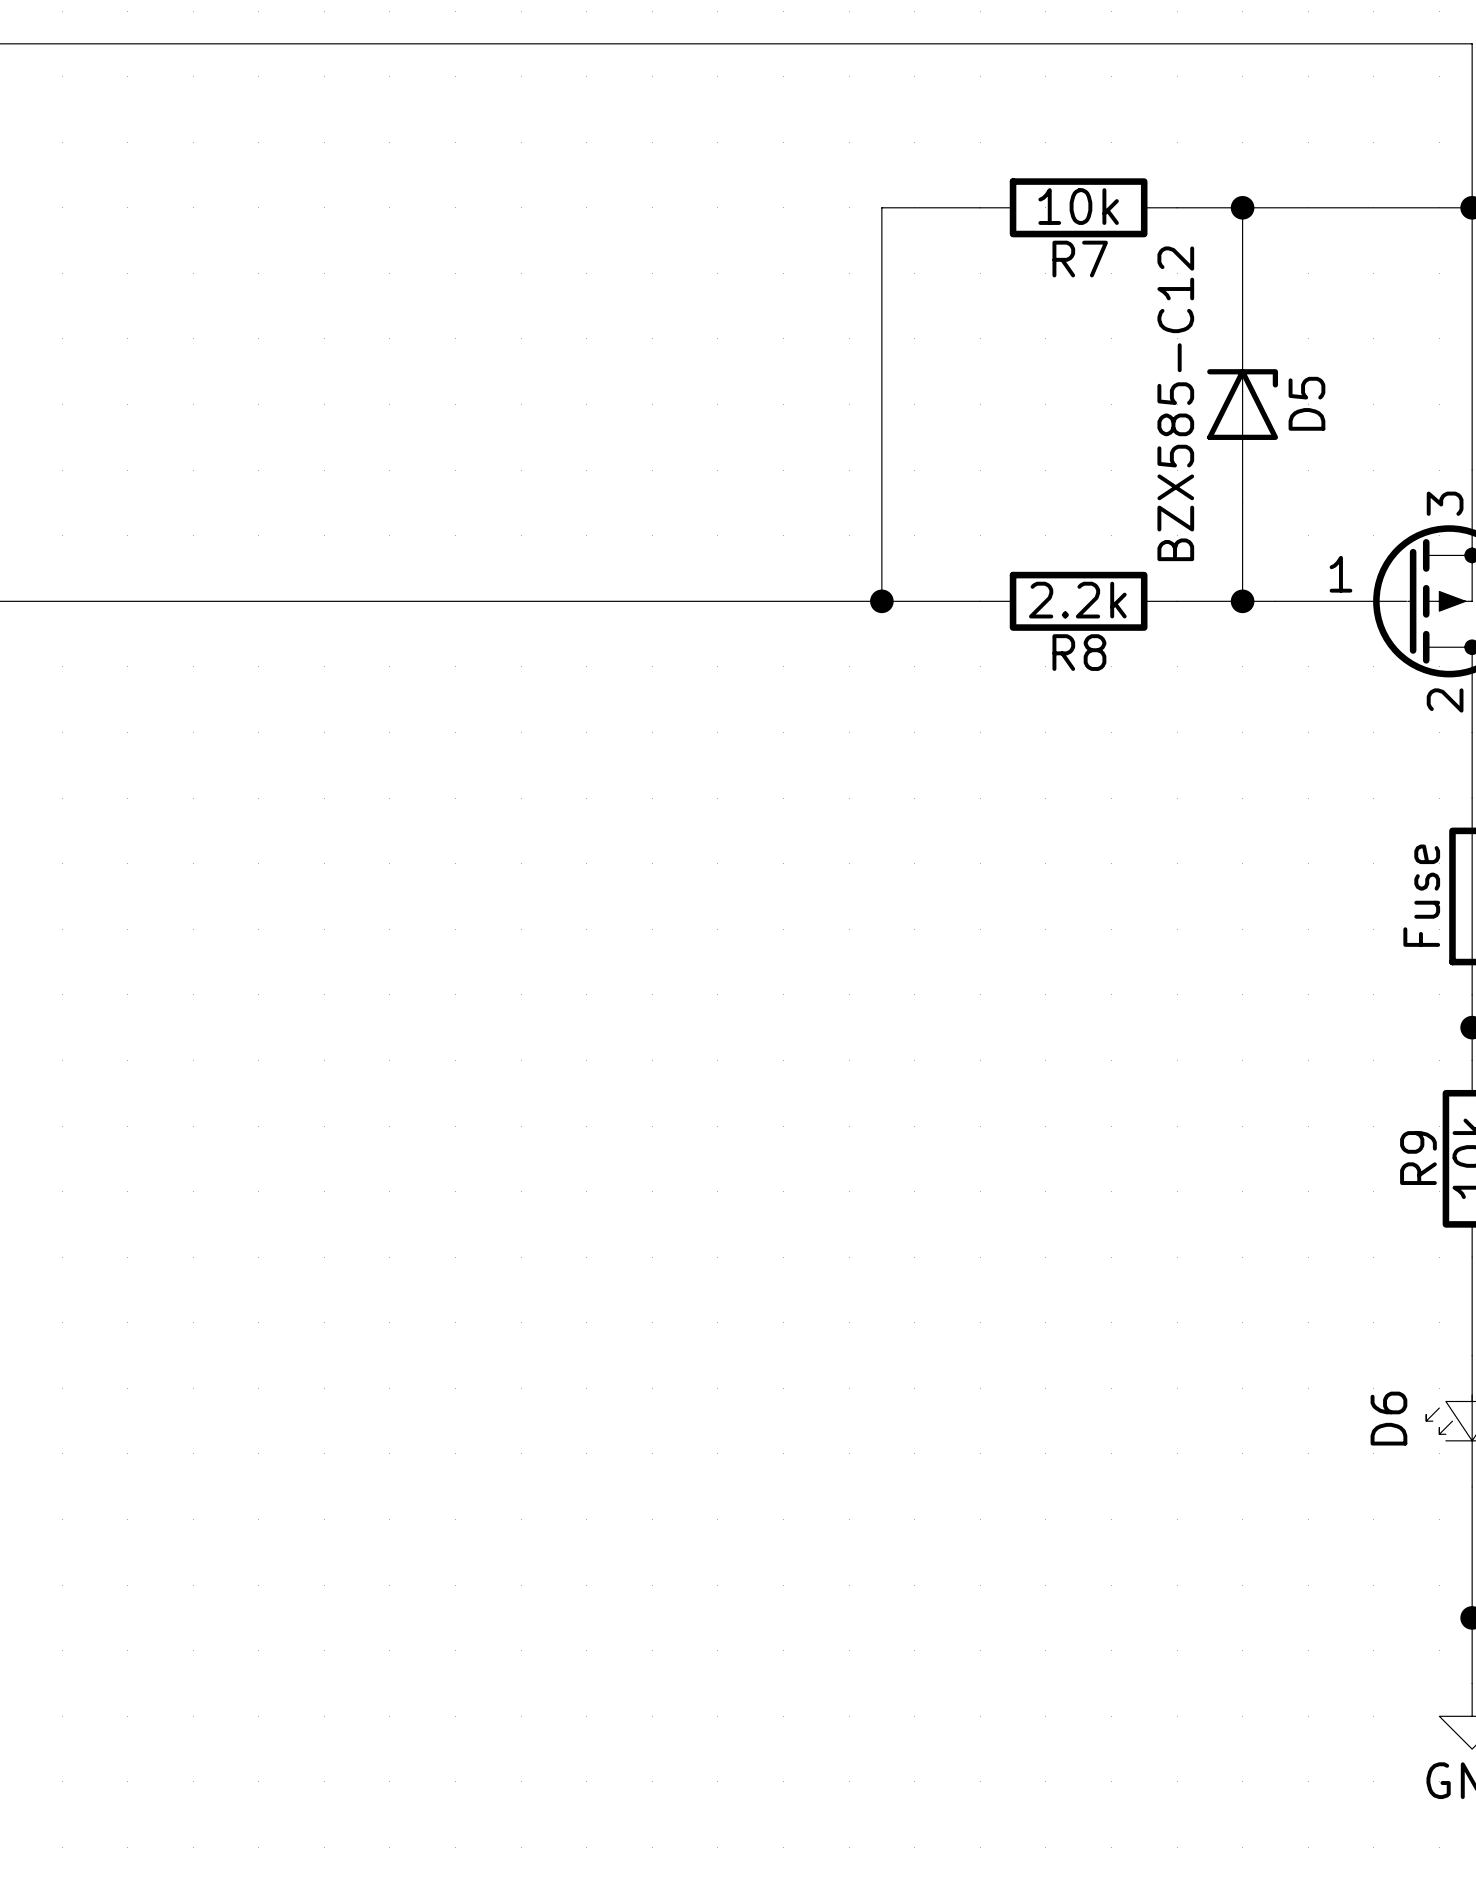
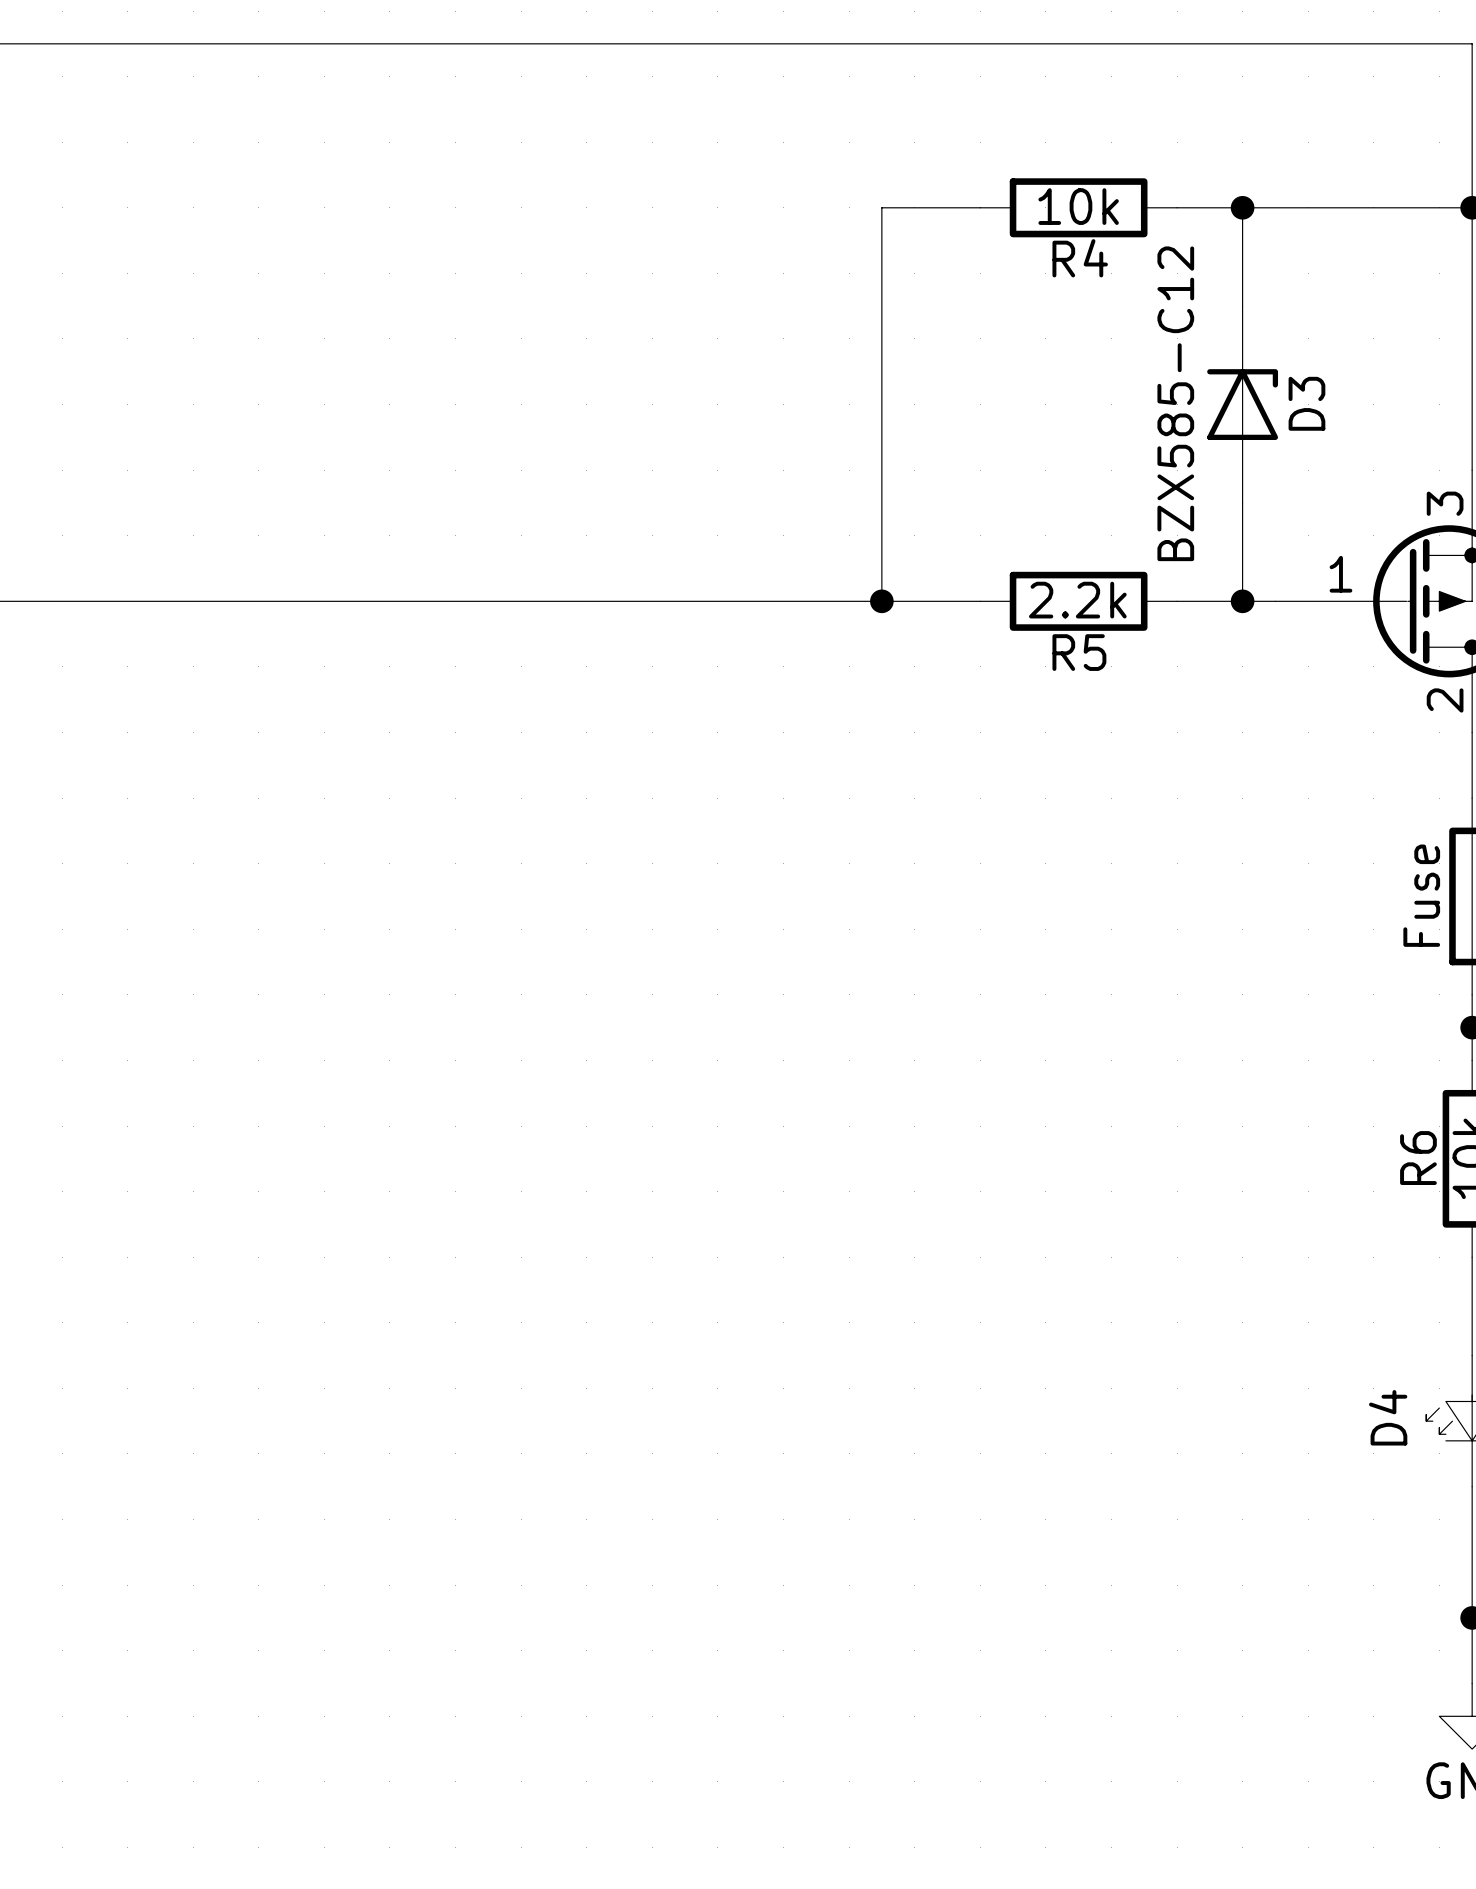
R7 name: R7 (1080, 259) -> R4 (1080, 258)
D5 name: D5 (1306, 403) -> D3 (1306, 403)
R8 name: R8 (1079, 652) -> R5 (1079, 652)
R9 name: R9 (1418, 1158) -> R6 (1418, 1158)
D6 name: D6 (1388, 1418) -> D4 (1388, 1417)

